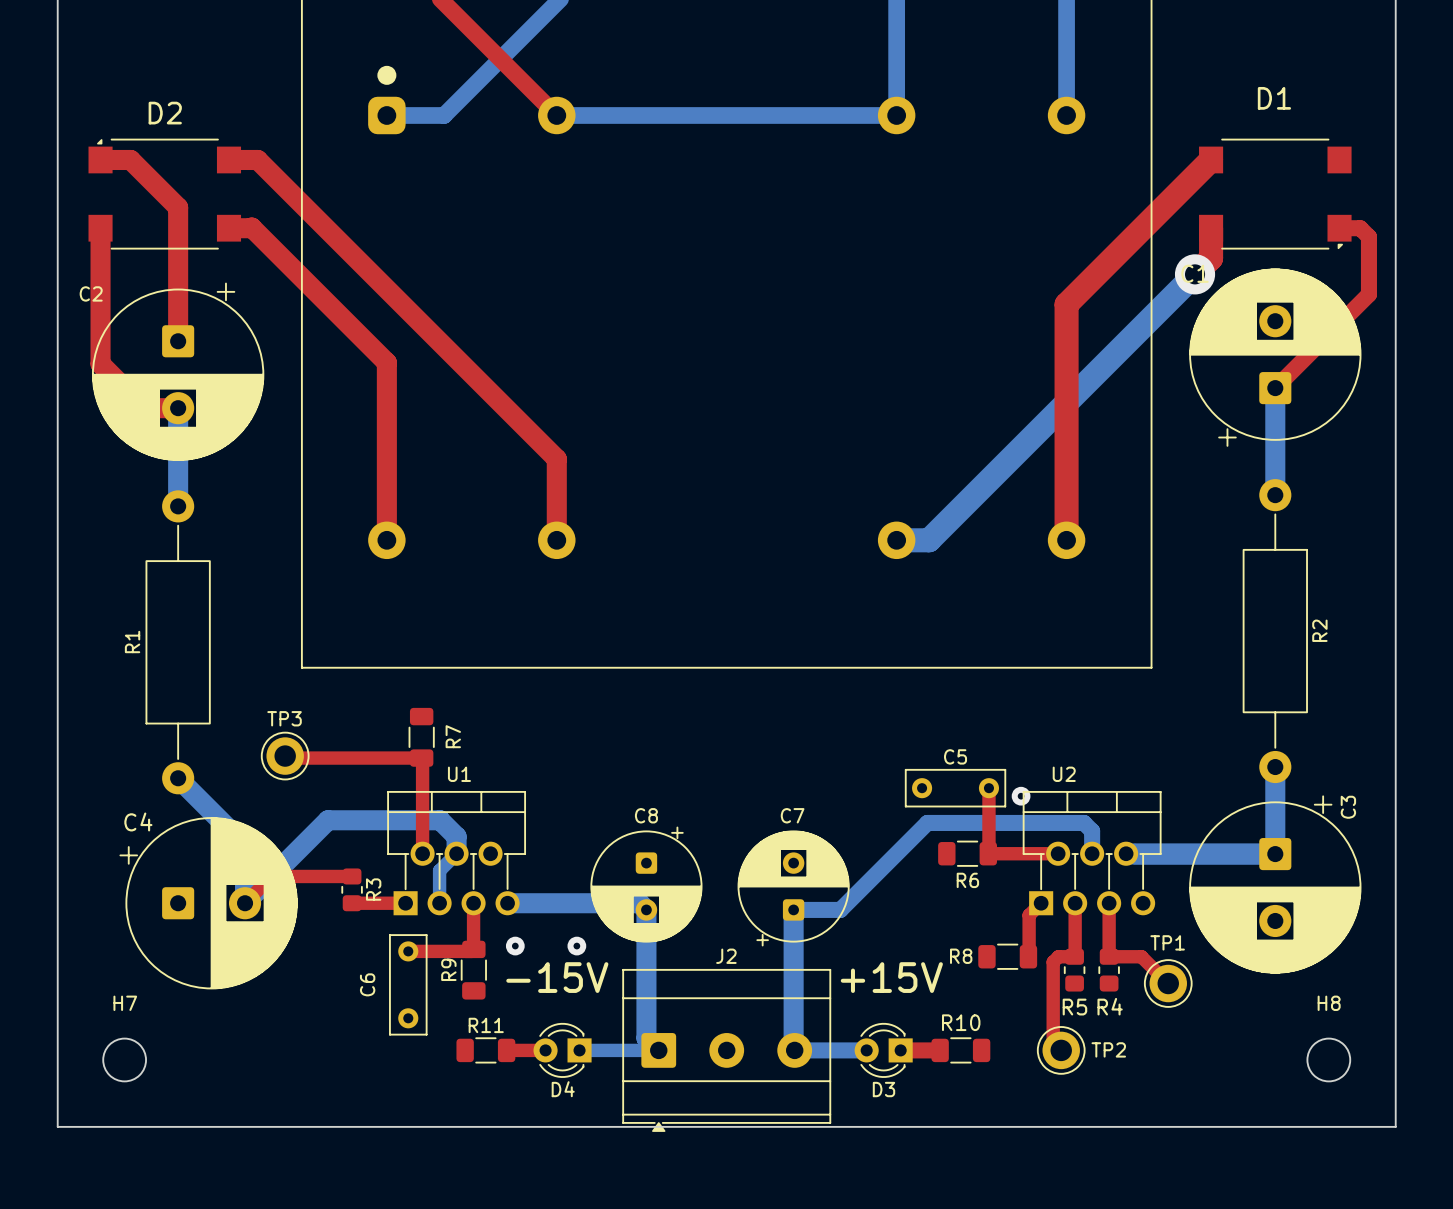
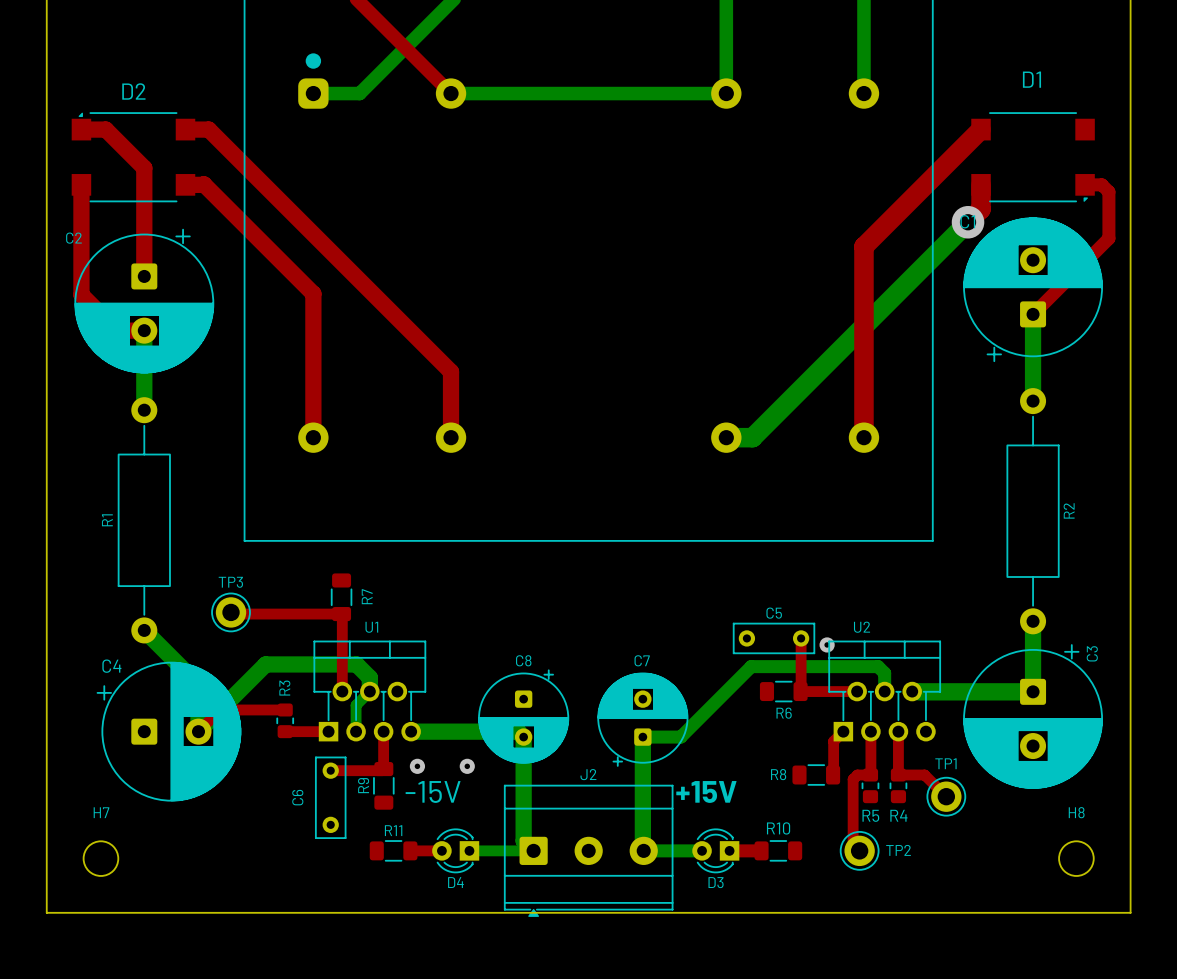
R3 name position: R3 (373, 889) -> R3 (284, 688)

